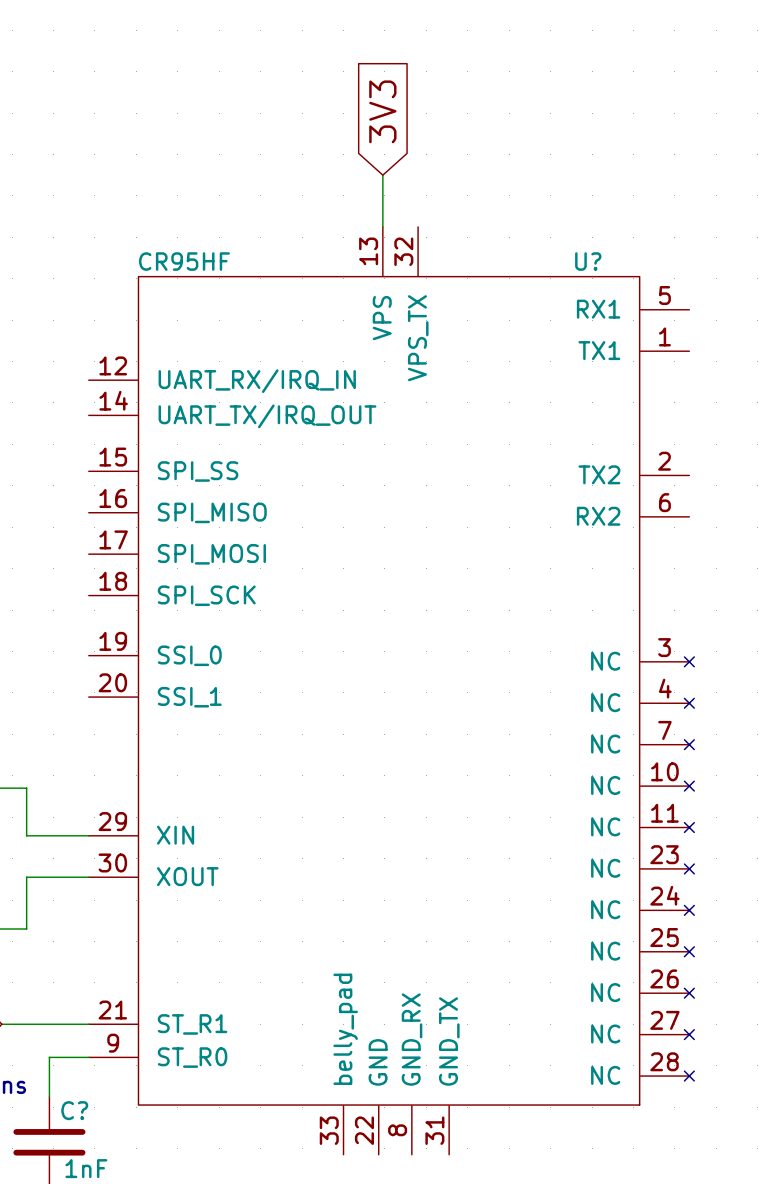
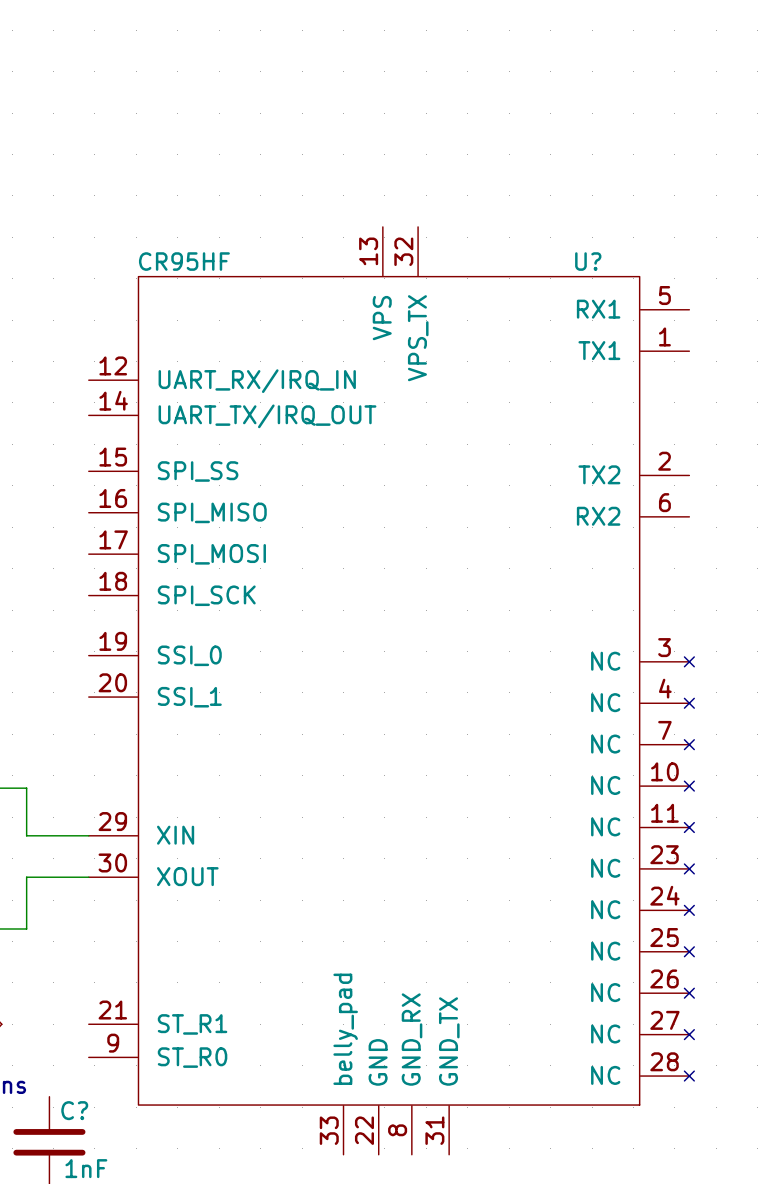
global label: 3V3 (382, 111) -> none
wire: (382, 175) (382, 226) -> none
wire: (1, 1024) (88, 1024) -> none
wire: (88, 1057) (49, 1057) (49, 1096) -> none

